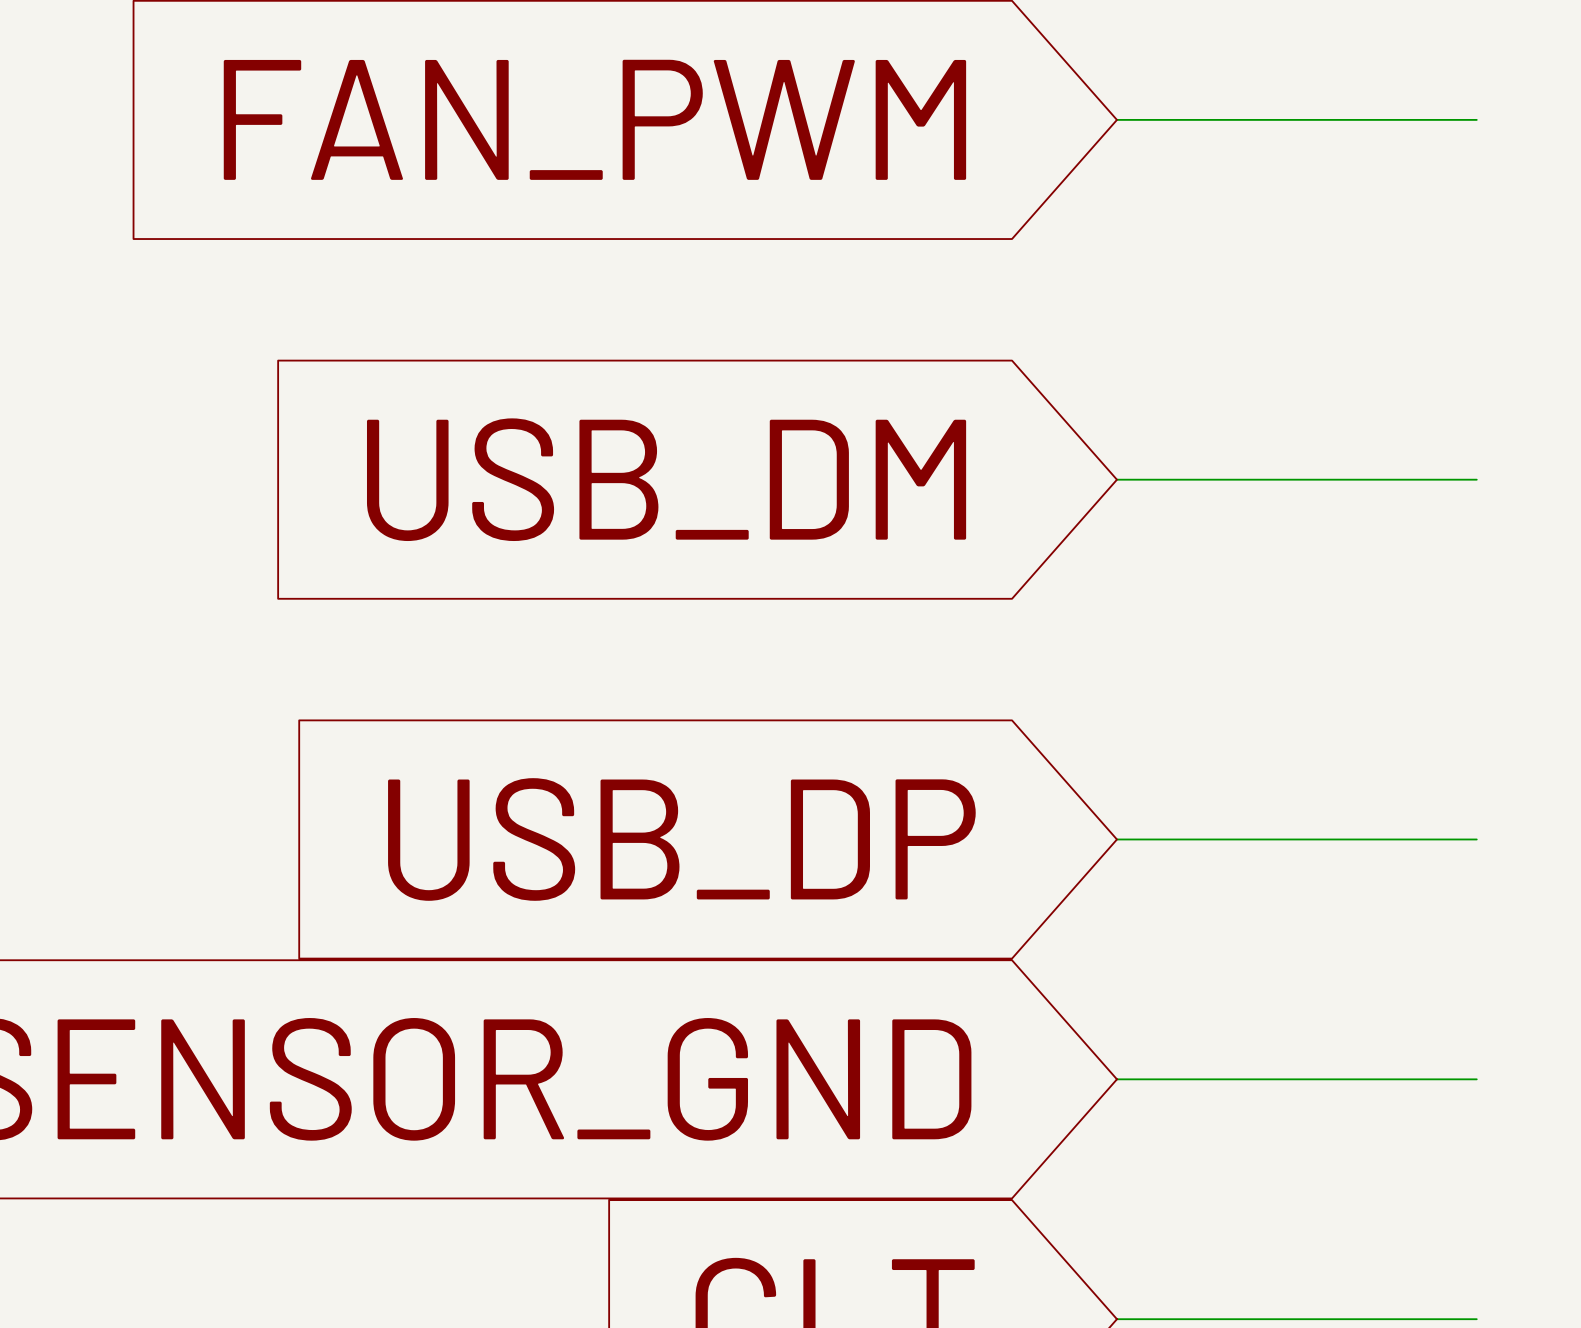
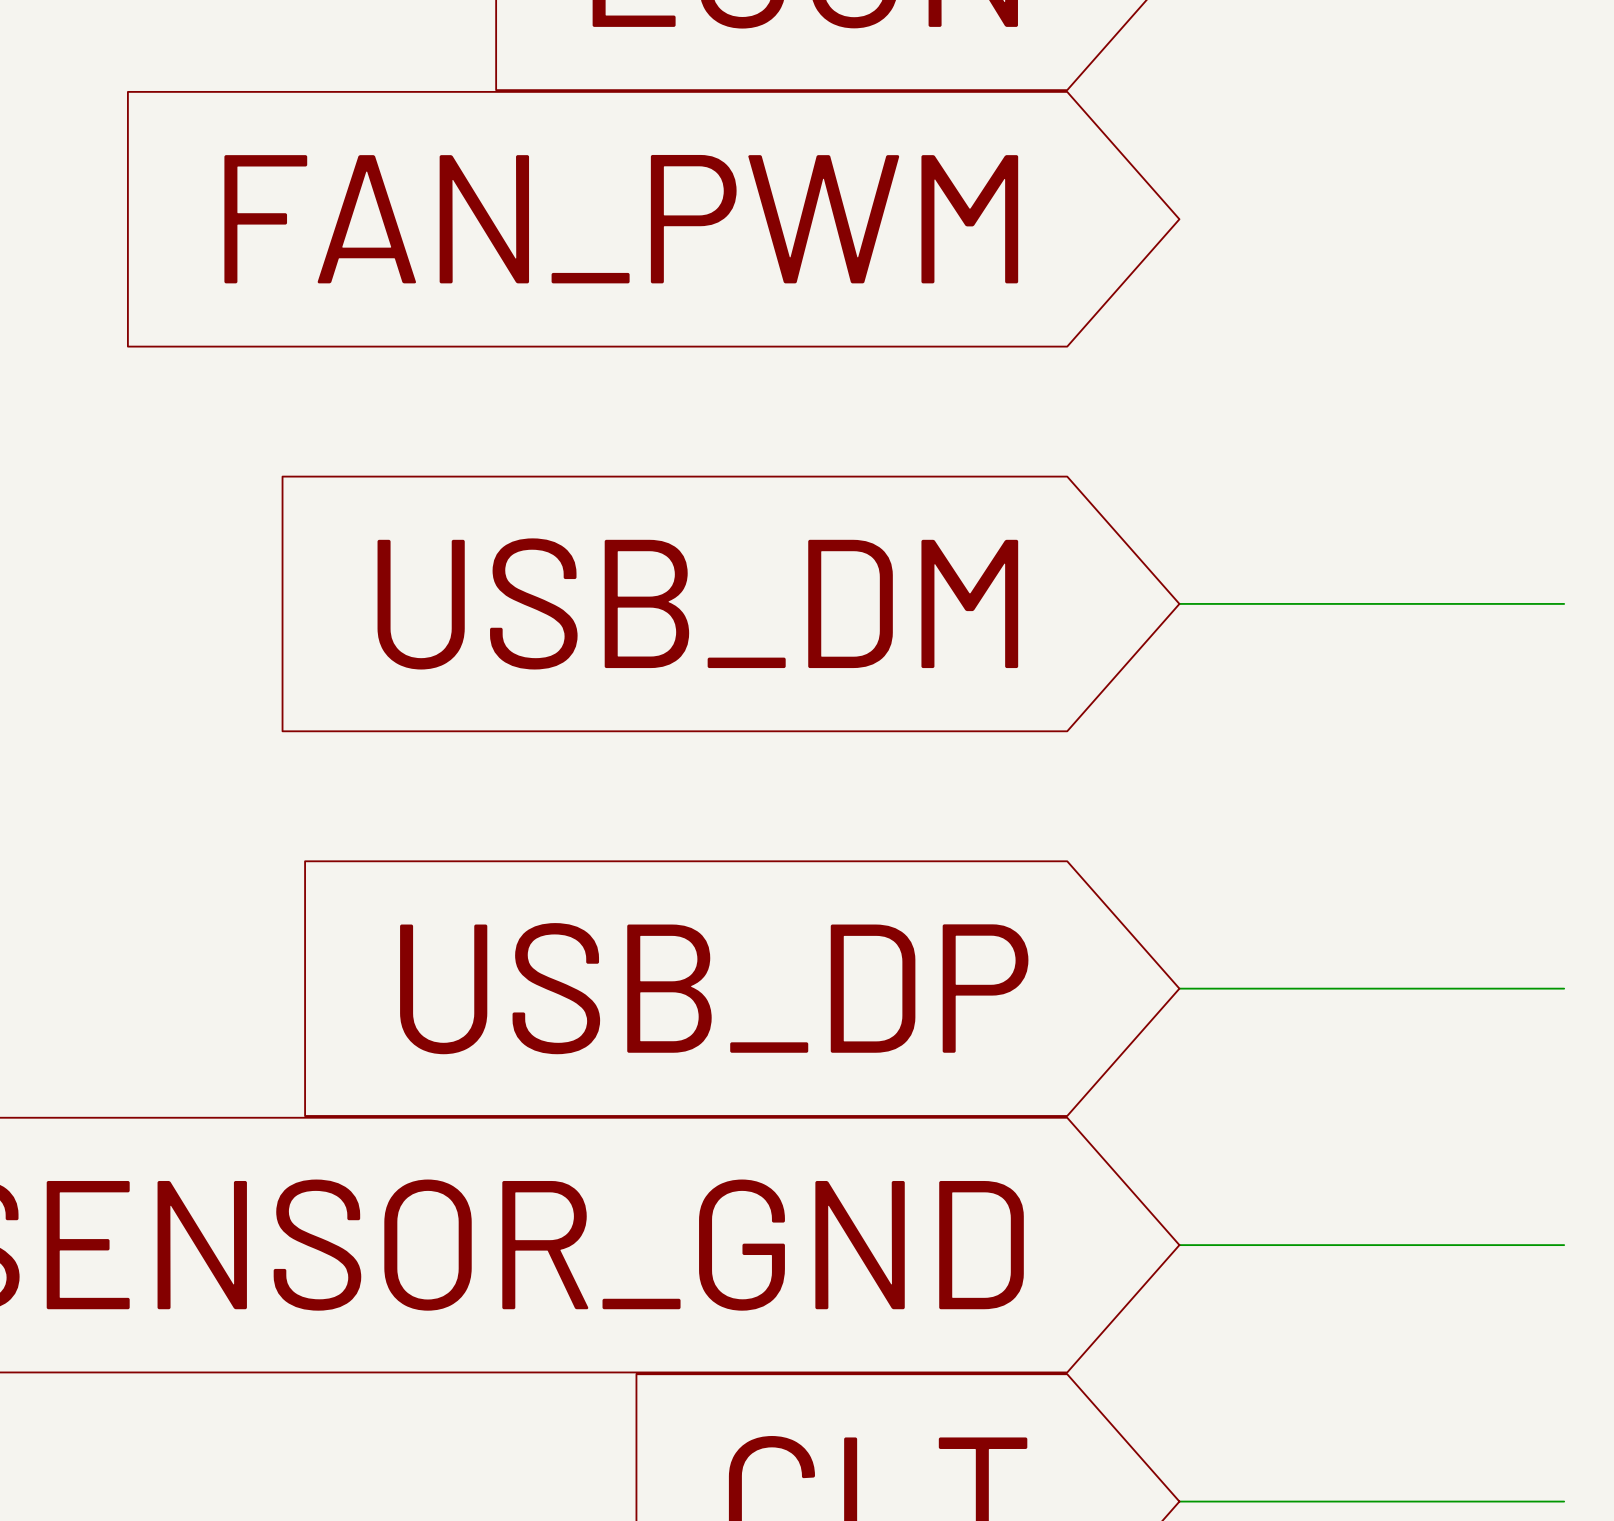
wire: (1116, 119) (1476, 119) -> none

